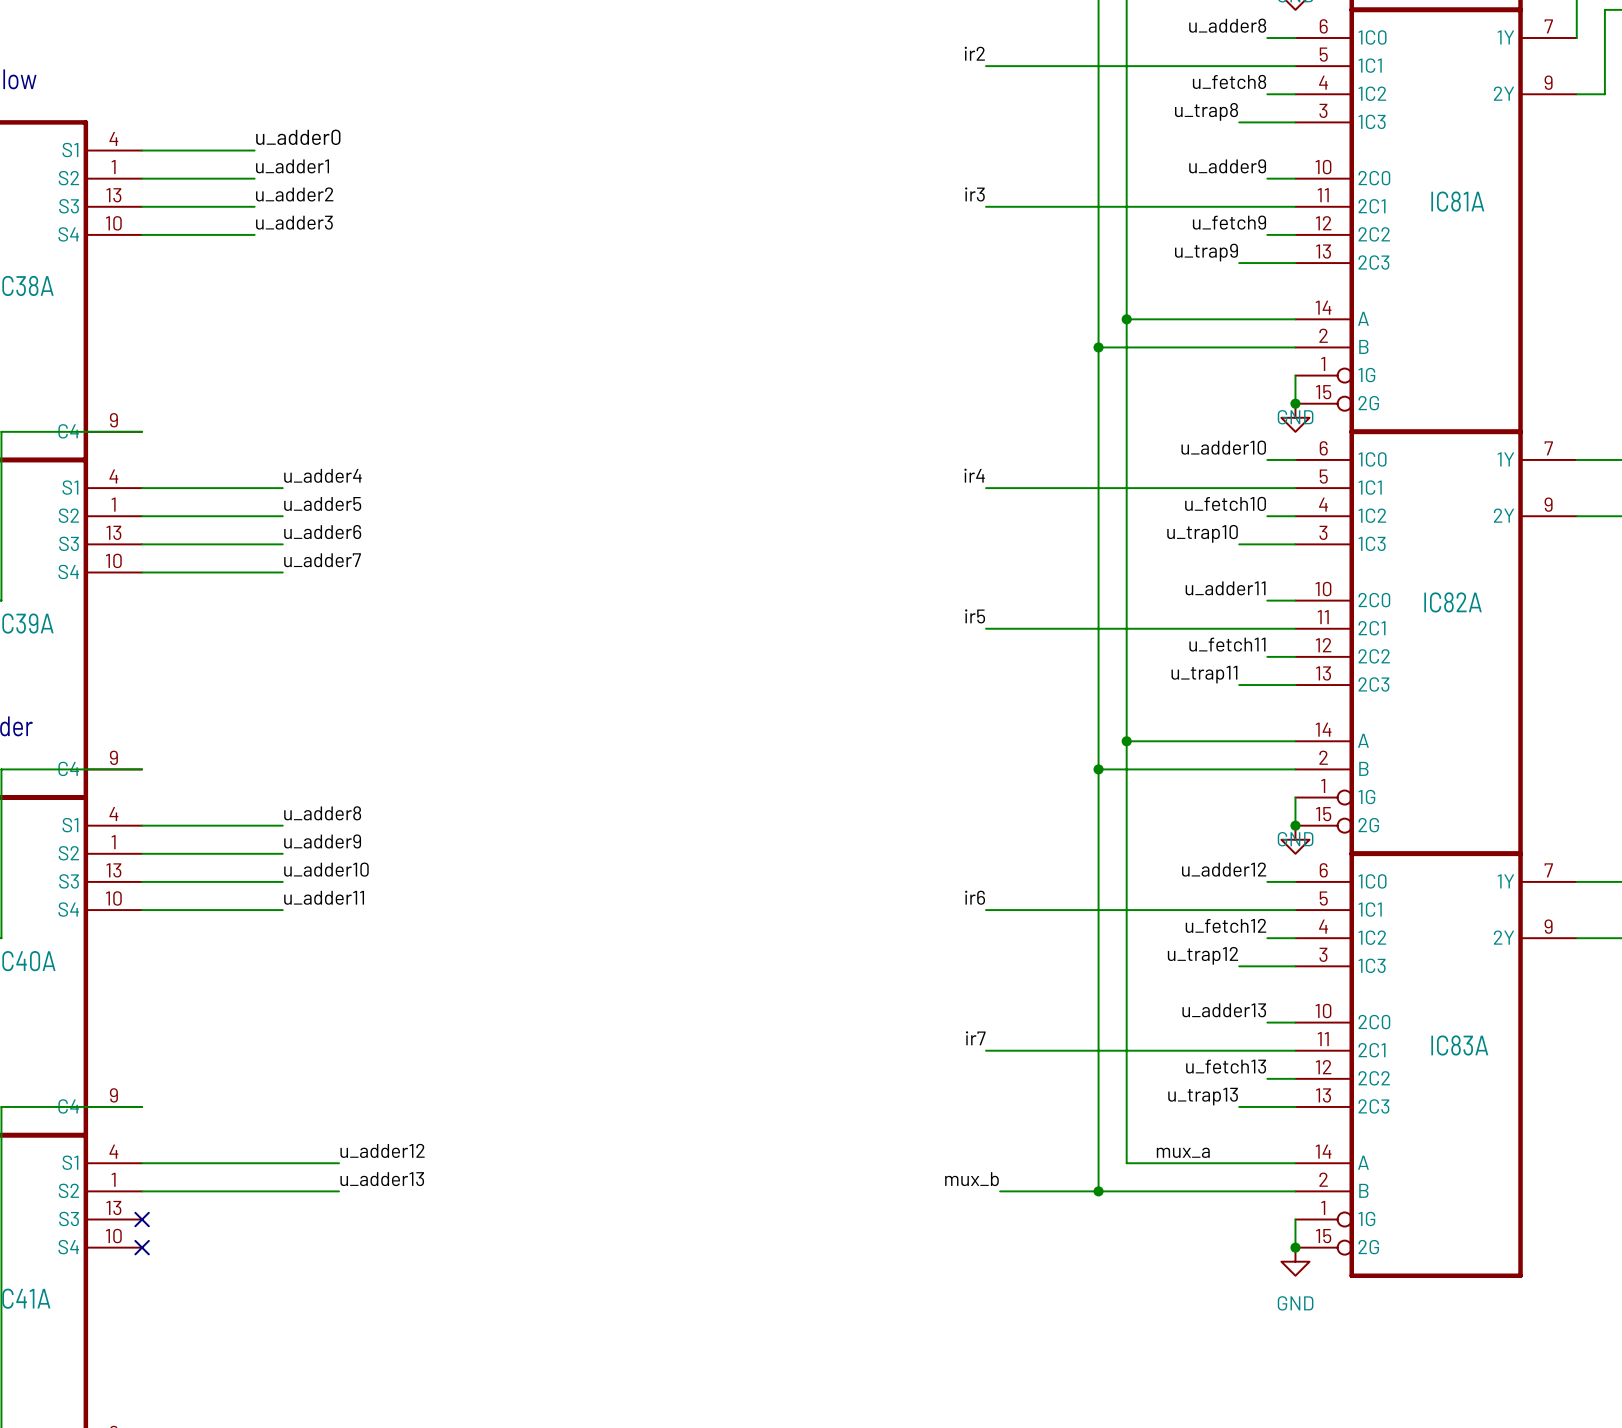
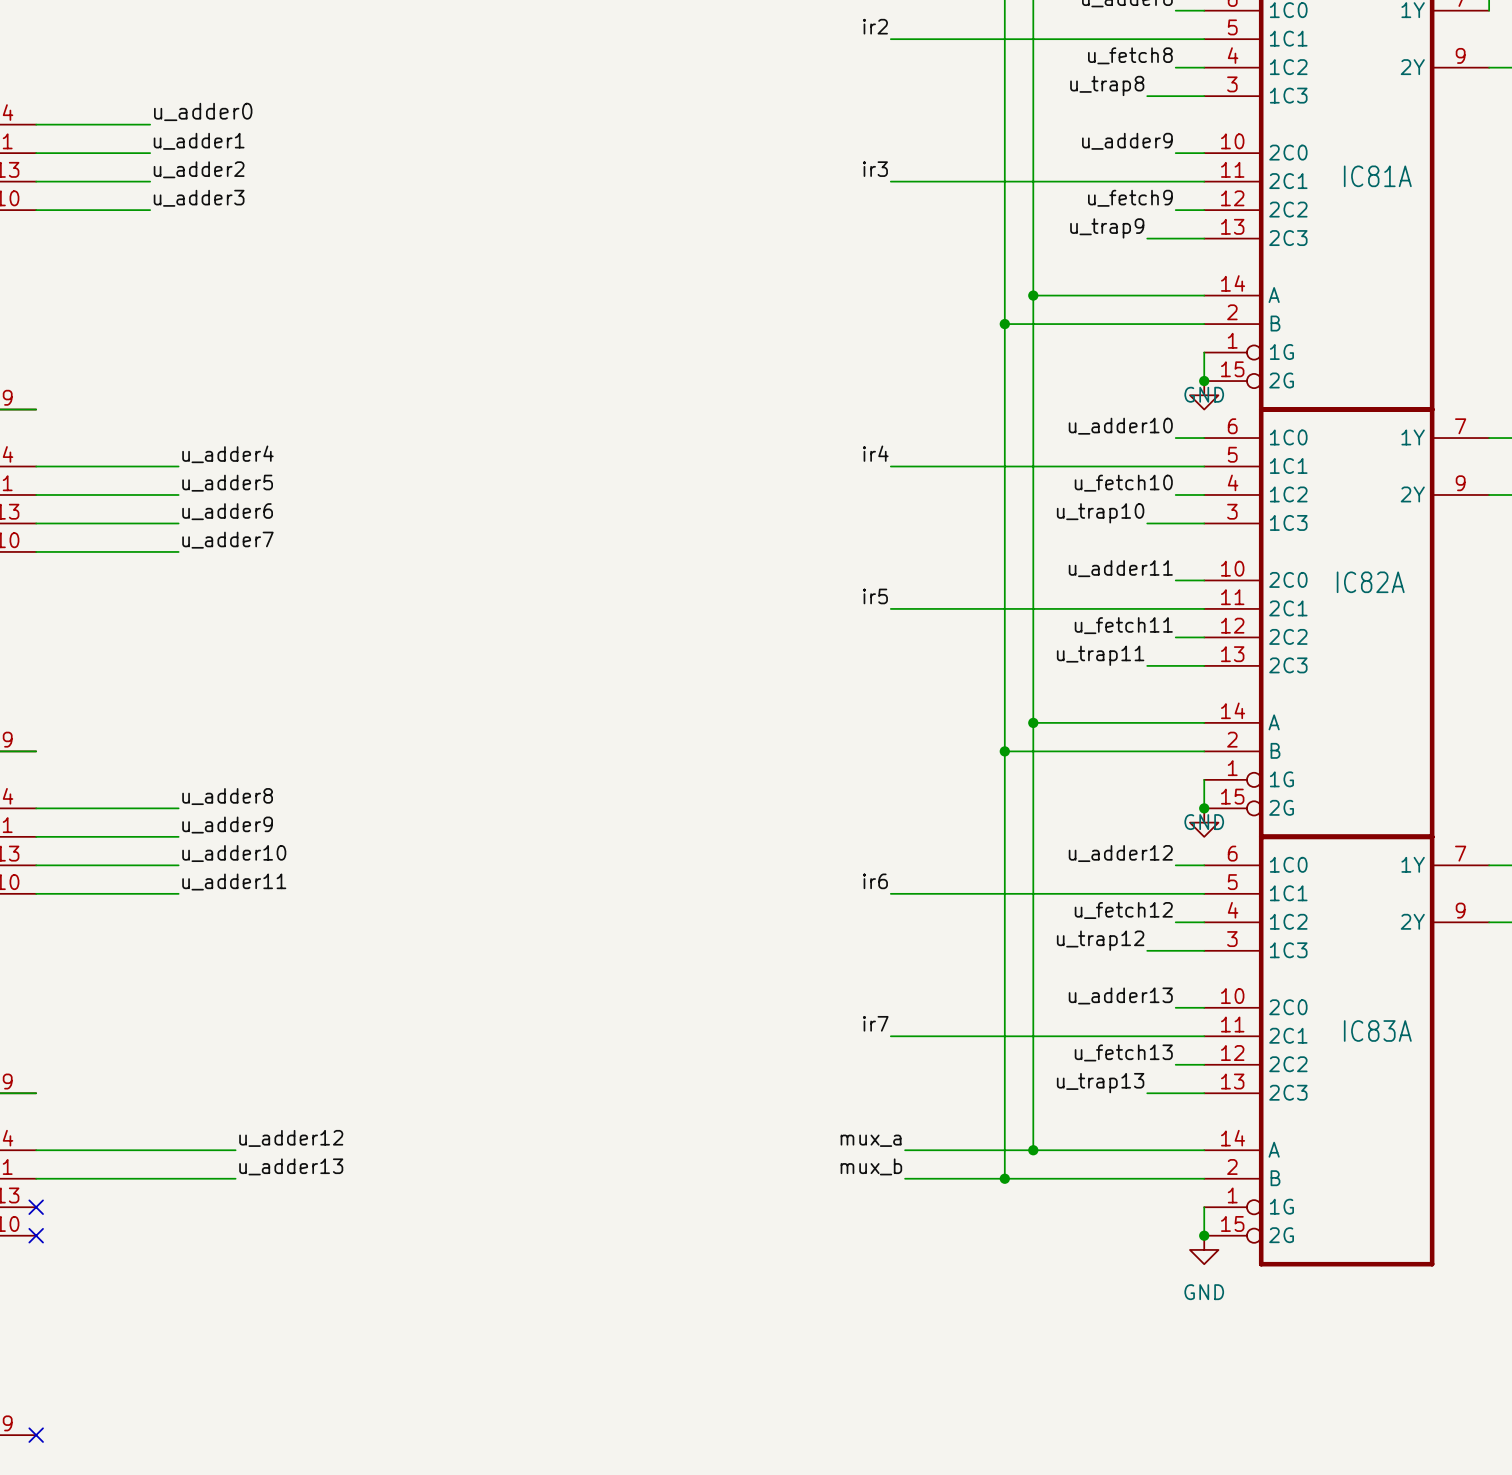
label position: mux_a (1183, 1152) -> mux_a (871, 1140)
wire: none -> (905, 1150) (1033, 1150)
junction: none -> (1033, 1150)

